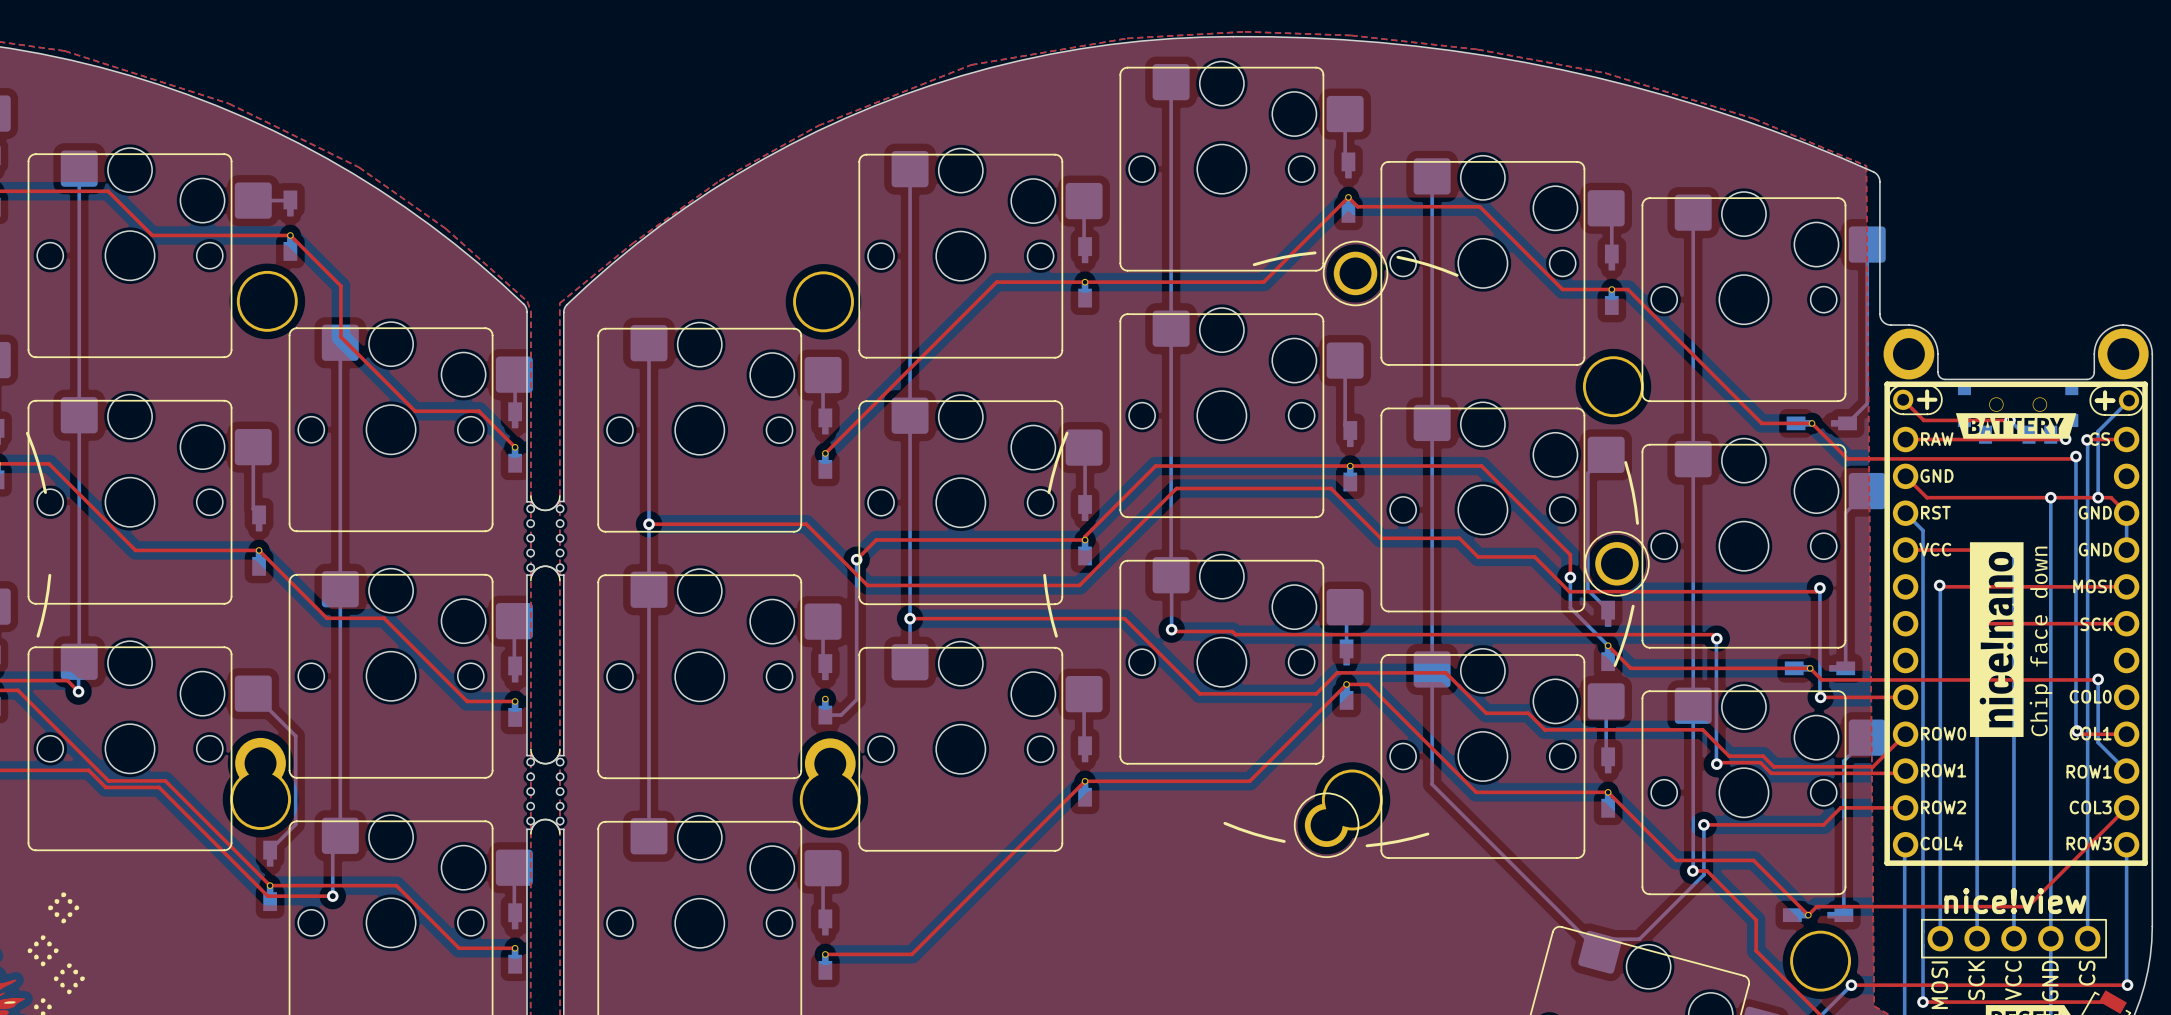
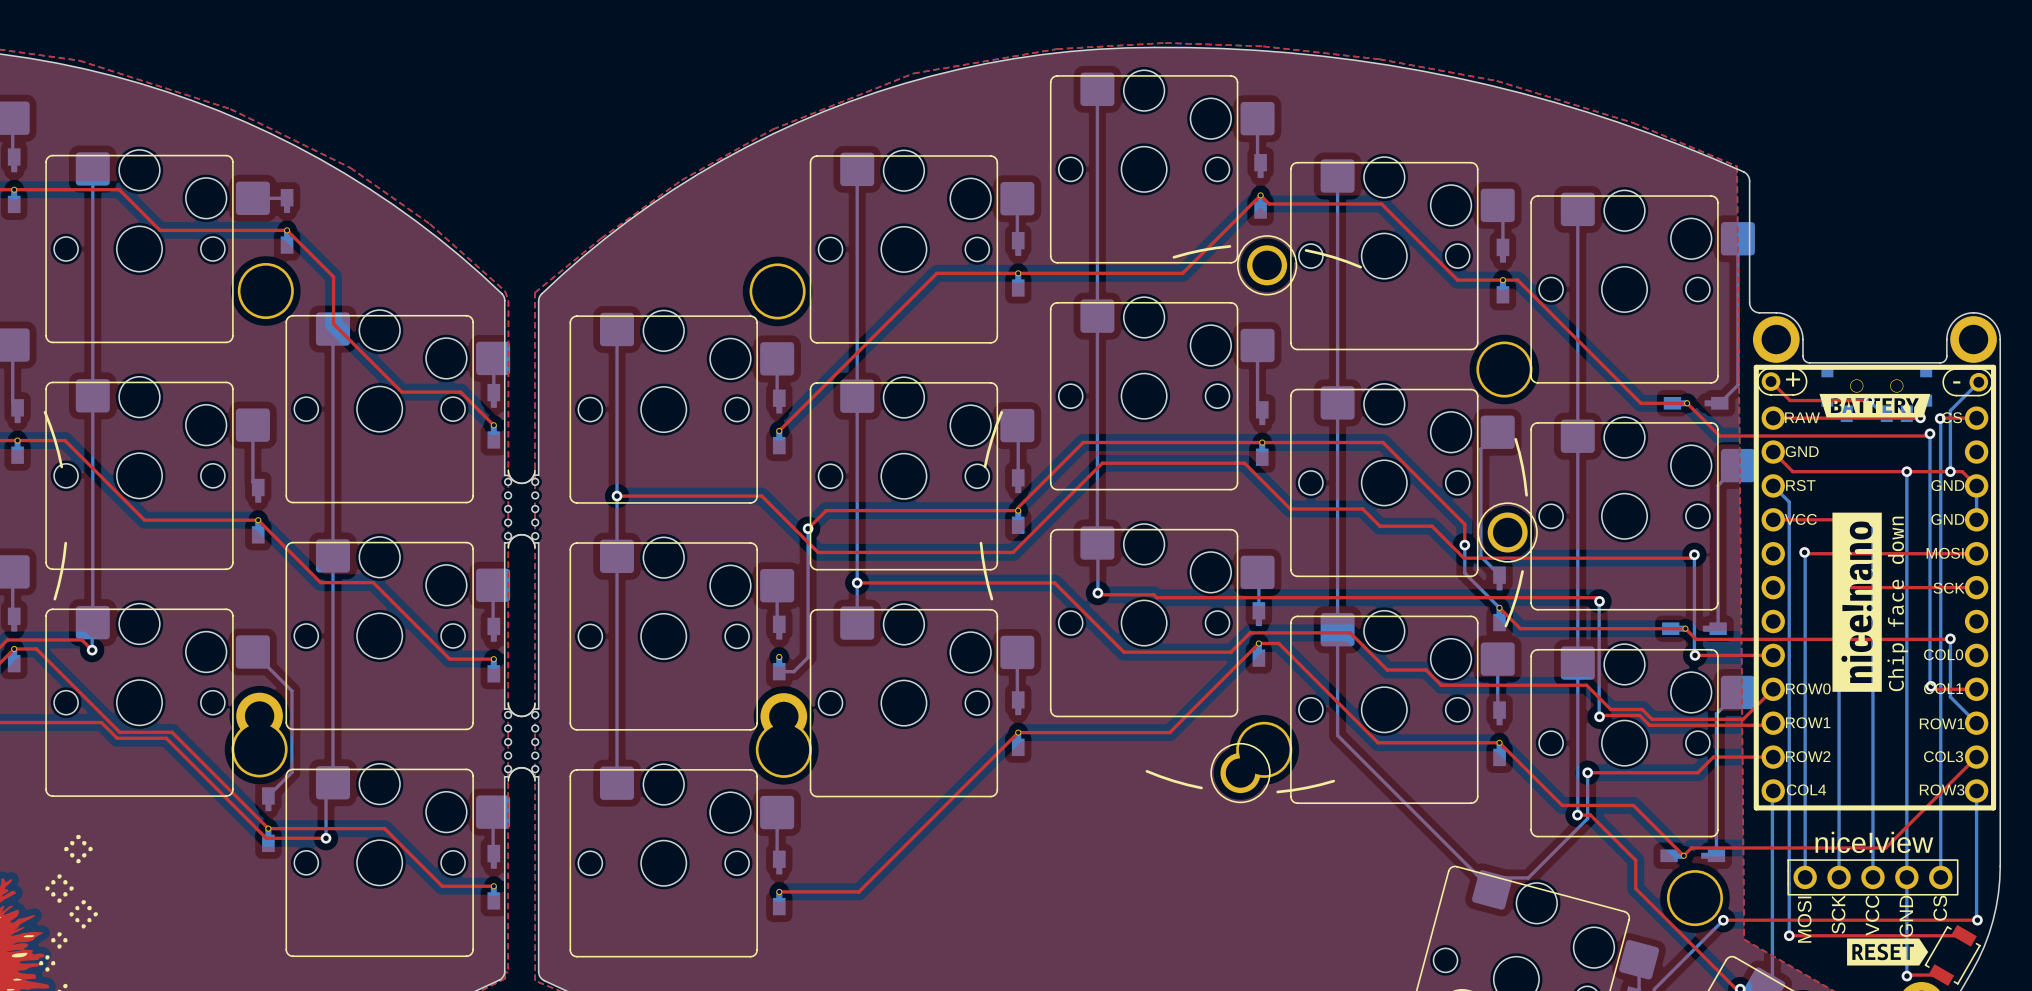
part footprint: [2089, 385, 2145, 416] -> [1942, 368, 1993, 397]

